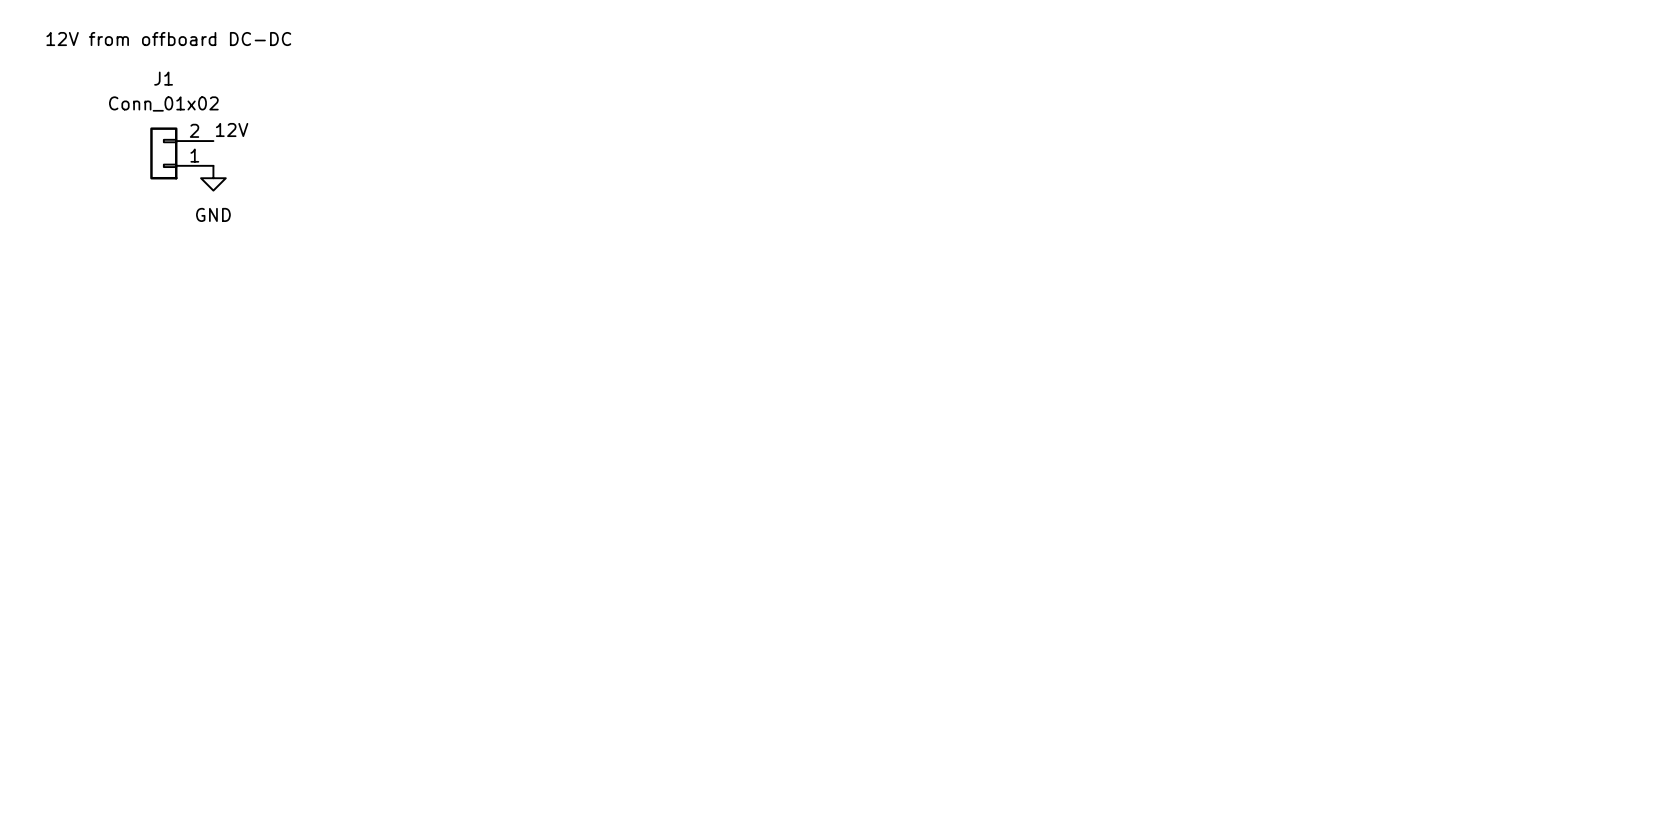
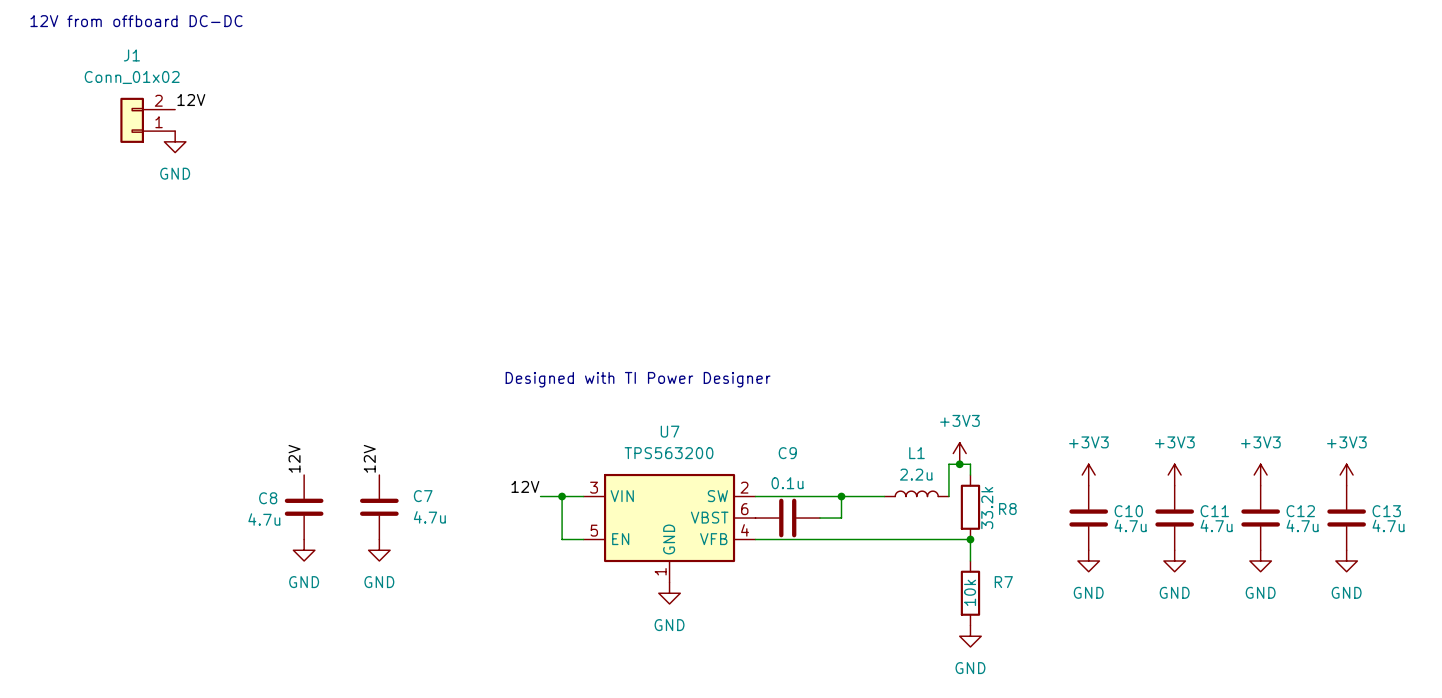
text: none -> Designed with TI Power Designer (638, 379)
power symbol: none -> +3V3 (959, 453)
label: none -> 12V (294, 458)
label: none -> 12V (369, 458)
junction: none -> (959, 464)
wire: none -> (970, 475) (970, 464) (948, 464) (948, 496)
power symbol: none -> +3V3 (1088, 475)
power symbol: none -> +3V3 (1174, 475)
power symbol: none -> +3V3 (1260, 475)
power symbol: none -> +3V3 (1346, 475)
label: none -> 12V (525, 486)
L1: none -> 2.2u (916, 493)
wire: none -> (540, 496) (583, 496)
wire: none -> (562, 496) (562, 539) (583, 539)
junction: none -> (562, 496)
wire: none -> (755, 496) (884, 496)
wire: none -> (841, 496) (841, 518) (820, 518)
junction: none -> (841, 496)
C8: none -> 4.7u (304, 507)
C7: none -> 4.7u (379, 507)
R8: none -> 33.2k (970, 507)
C9: none -> 0.1u (787, 518)
C10: none -> 4.7u (1088, 518)
C11: none -> 4.7u (1174, 518)
C12: none -> 4.7u (1260, 518)
C13: none -> 4.7u (1346, 518)
U7: none -> TPS563200 (669, 528)
wire: none -> (755, 539) (970, 539) (970, 561)
junction: none -> (970, 539)
power symbol: none -> GND (304, 550)
power symbol: none -> GND (379, 550)
power symbol: none -> GND (1088, 561)
power symbol: none -> GND (1174, 561)
power symbol: none -> GND (1260, 561)
power symbol: none -> GND (1346, 561)
power symbol: none -> GND (669, 593)
R7: none -> 10k (970, 593)
power symbol: none -> GND (970, 636)

